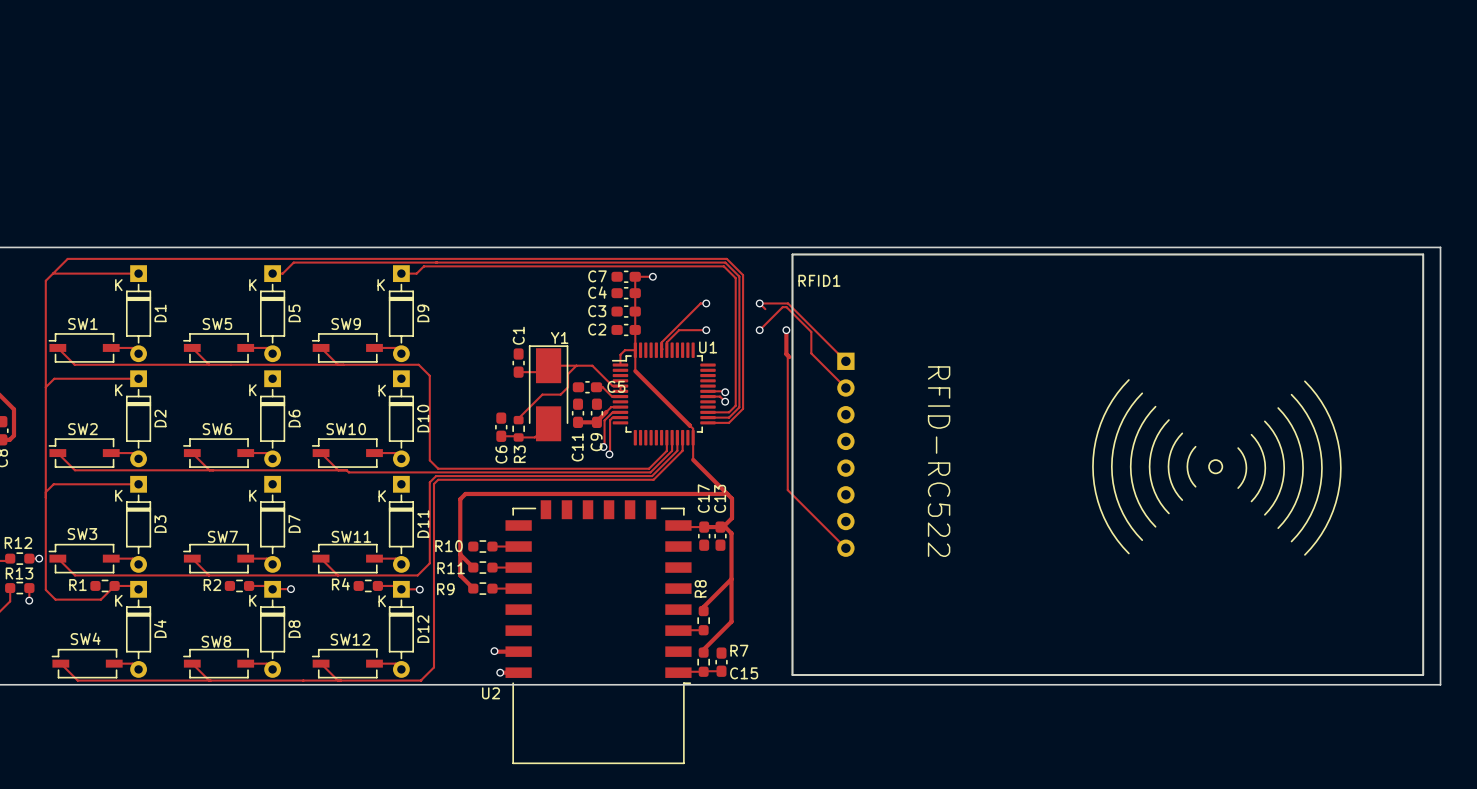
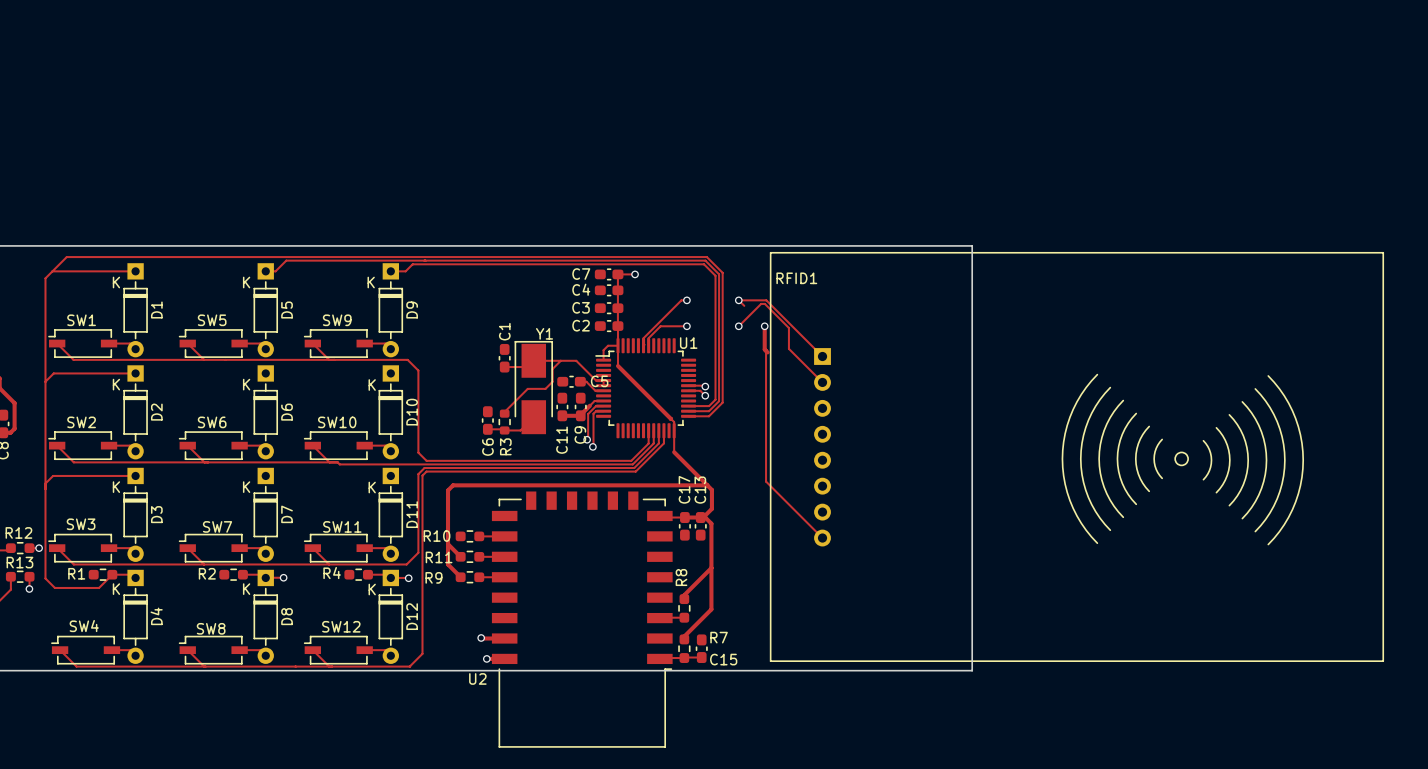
board edge: (1000, 247) (1440, 247) (1440, 684) (1000, 684) -> (972, 245) (972, 670)
RFID1 footprint: [791, 253, 1424, 676] -> [770, 252, 1384, 662]

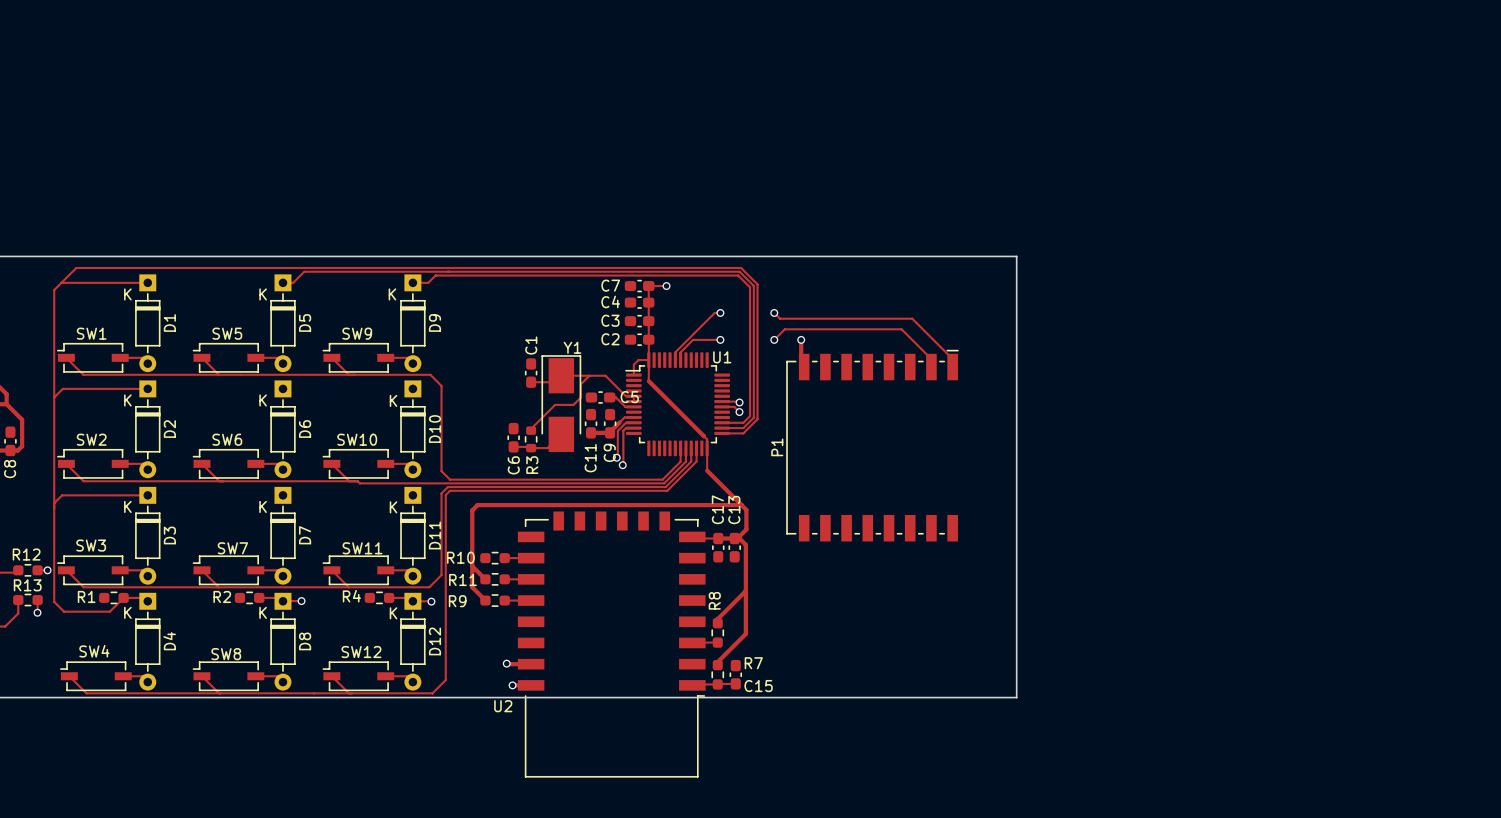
track: (738, 300) (766, 300) (822, 356) -> none
track: none -> (780, 318) (912, 318) (952, 359) (952, 367)
track: (749, 316) (761, 303) (764, 303) (788, 327) (788, 348) (822, 382) -> (784, 329) (901, 329) (931, 359) (931, 367)
track: (766, 350) (766, 481) (822, 538) -> none
P1: none -> (872, 445)
RFID1: (1076, 456) -> none

